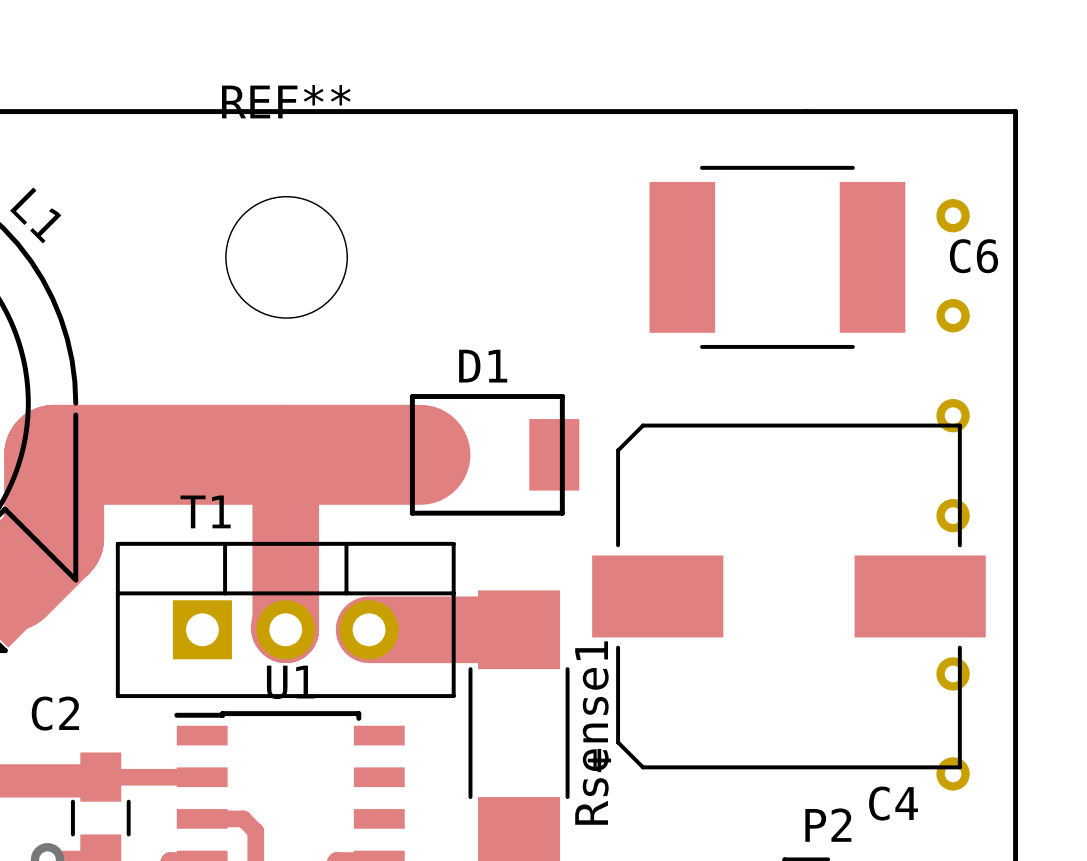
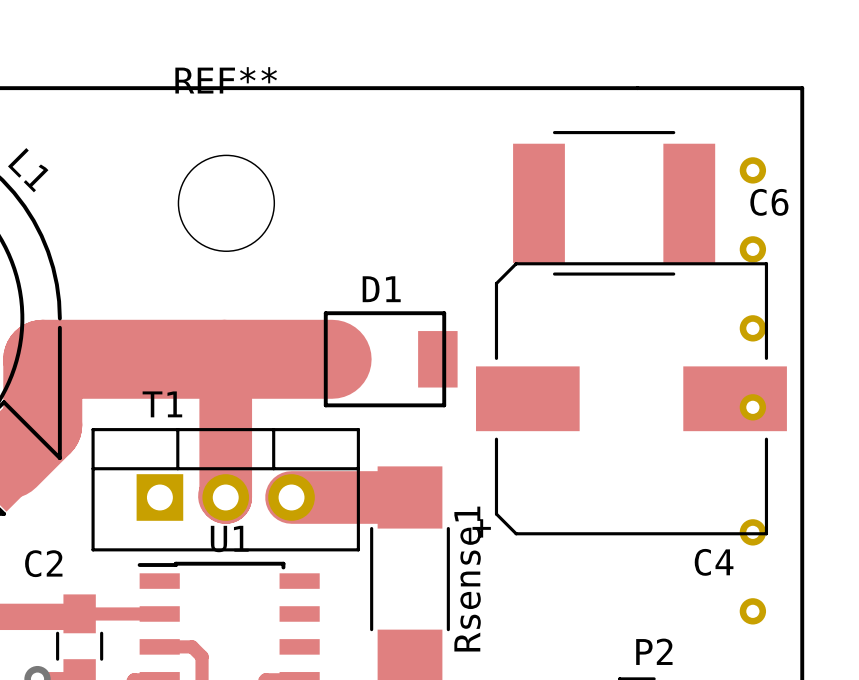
C4 position: (788, 596) -> (631, 398)

